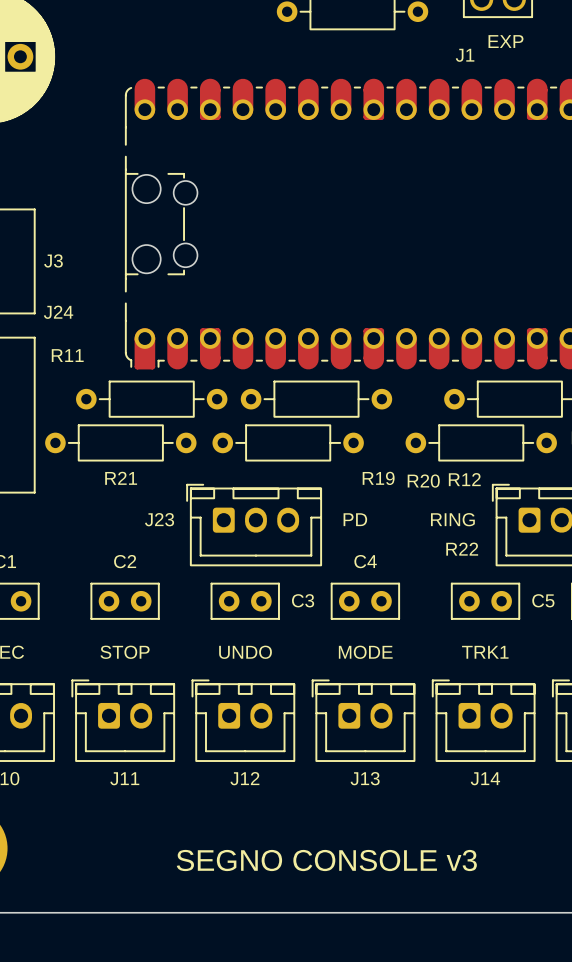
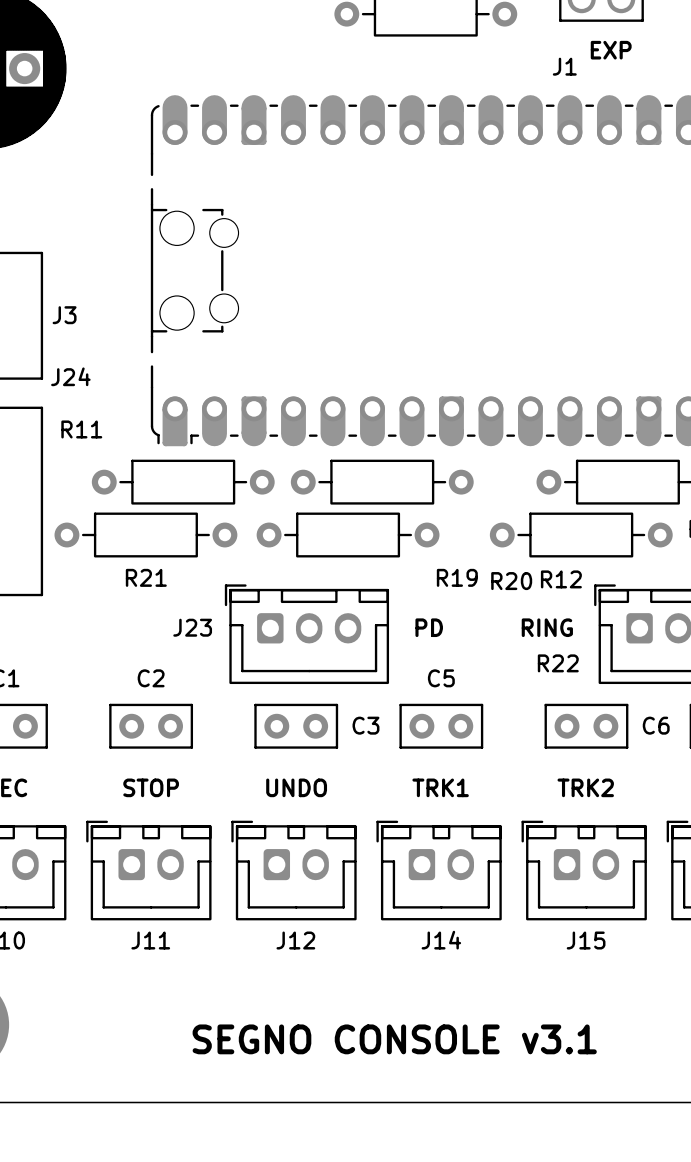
C4 name: C4 (365, 561) -> C5 (441, 678)
C5 name: C5 (543, 600) -> C6 (656, 725)
text: MODE (365, 652) -> TRK1 (440, 787)
text: TRK1 (485, 652) -> TRK2 (585, 787)
J13 name: J13 (365, 778) -> J14 (441, 940)
J14 name: J14 (485, 778) -> J15 (586, 940)
text: SEGNO CONSOLE v3 (326, 860) -> SEGNO CONSOLE v3.1 (394, 1039)

